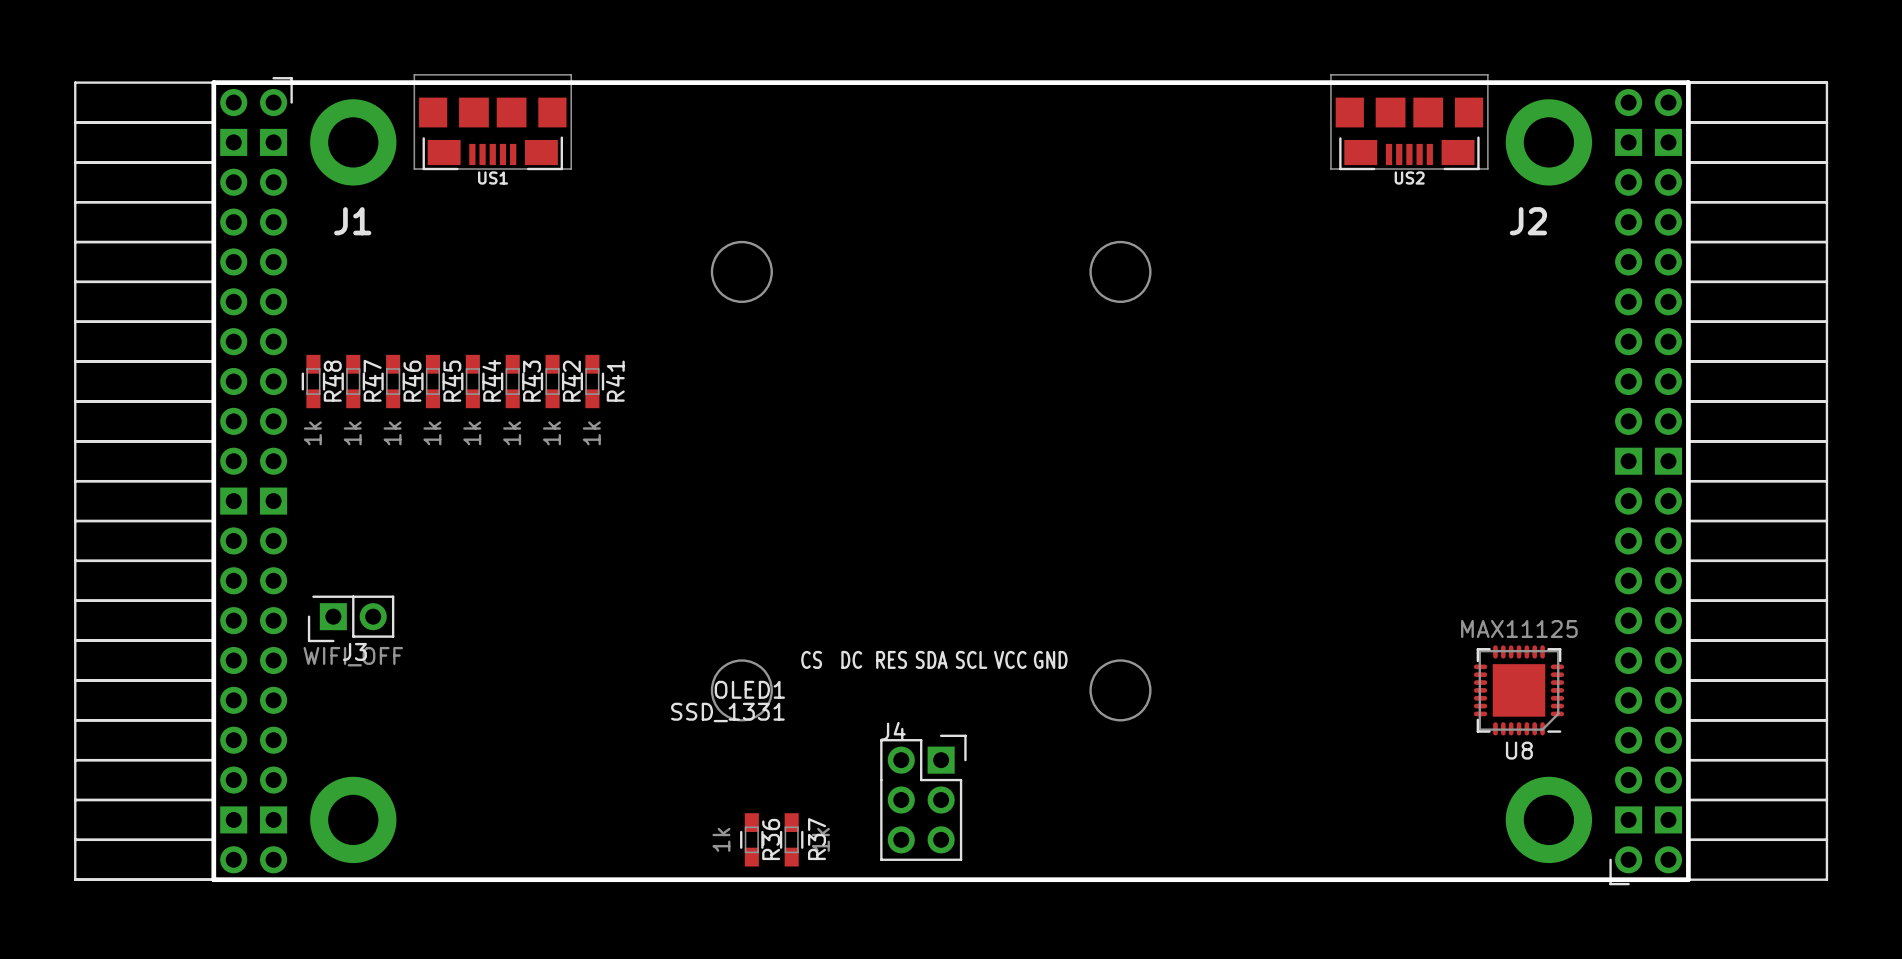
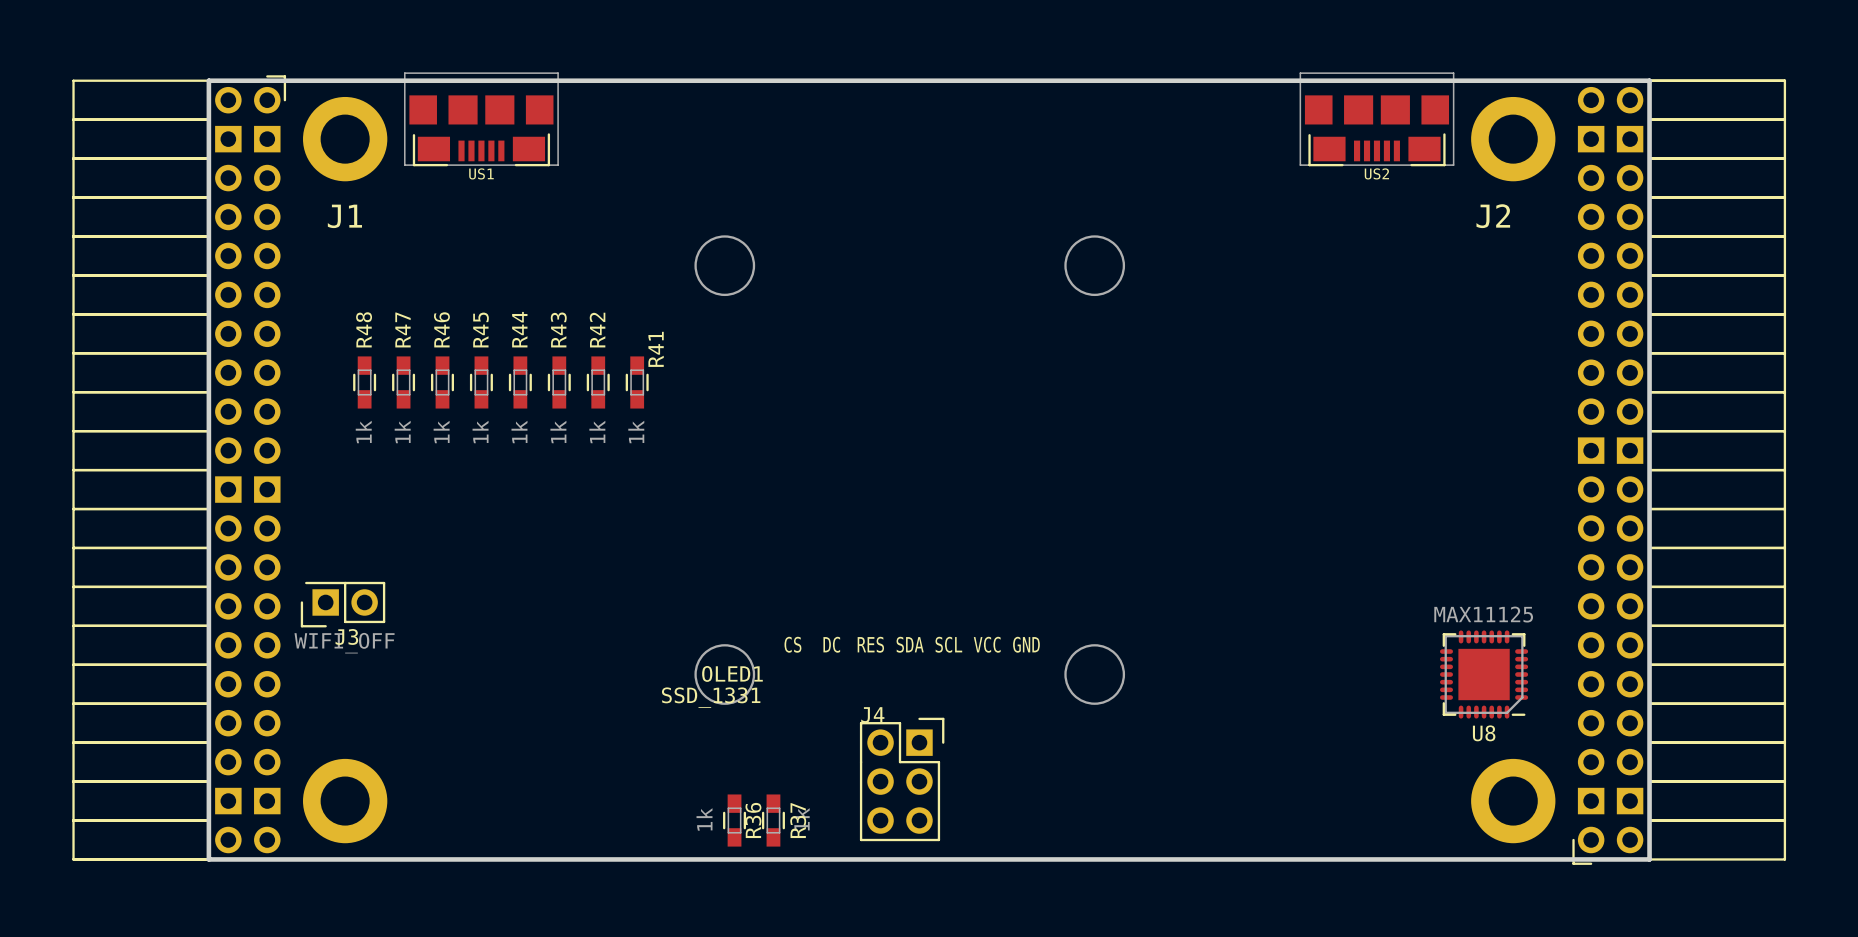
R47 name position: R47 (372, 380) -> R47 (402, 329)
R44 name position: R44 (491, 380) -> R44 (519, 329)
R48 position: (313, 381) -> (364, 382)
R48 name position: R48 (332, 381) -> R48 (364, 329)
R47 position: (353, 381) -> (403, 382)
R46 position: (393, 381) -> (442, 382)
R46 name position: R46 (412, 381) -> R46 (441, 329)
R45 position: (432, 381) -> (481, 382)
R45 name position: R45 (451, 381) -> R45 (481, 330)
R44 position: (472, 381) -> (520, 382)
R43 position: (512, 381) -> (559, 382)
R43 name position: R43 (531, 381) -> R43 (558, 329)
R42 position: (552, 381) -> (598, 382)
R42 name position: R42 (571, 381) -> R42 (597, 330)
R41 position: (592, 381) -> (637, 382)
R41 name position: R41 (615, 381) -> R41 (656, 349)

